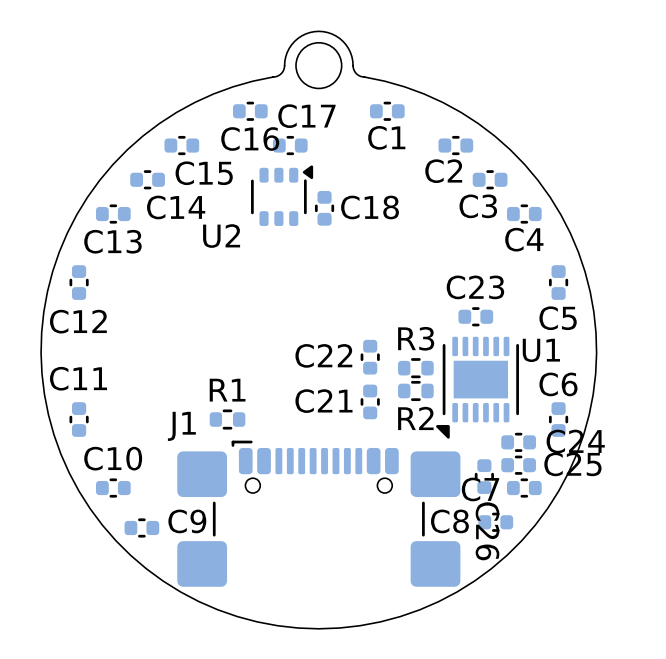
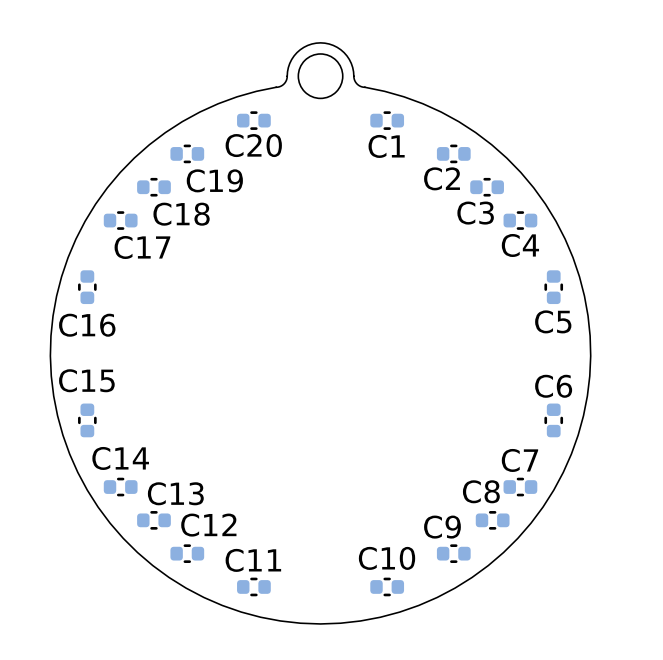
C16 name: C16 (250, 138) -> C20 (253, 145)
C17: (290, 145) -> none
C15 name: C15 (204, 173) -> C19 (214, 180)
U2: (282, 195) -> none
C14 name: C14 (176, 207) -> C18 (181, 214)
C18: (324, 208) -> none
C13 name: C13 (112, 241) -> C17 (142, 247)
C23: (475, 316) -> none
C12 name: C12 (78, 321) -> C16 (87, 325)
C22: (370, 357) -> none
R3: (415, 368) -> none
C11 name: C11 (78, 378) -> C15 (86, 380)
U1: (477, 387) -> none
R2: (415, 390) -> none
C21: (370, 401) -> none
R1: (227, 419) -> none
C24: (518, 442) -> none
C10 name: C10 (113, 458) -> C14 (120, 458)
C25: (518, 465) -> none
C26: (484, 476) -> none
C7 name position: C7 (480, 489) -> C7 (519, 460)
J1: (318, 513) -> none
C9 name position: C9 (187, 521) -> C9 (442, 527)
C8 name position: C8 (449, 521) -> C8 (481, 491)
C13: none -> (153, 520)
C9 position: (141, 527) -> (453, 553)
C12: none -> (187, 553)
C11: none -> (253, 586)
C10: none -> (387, 586)

